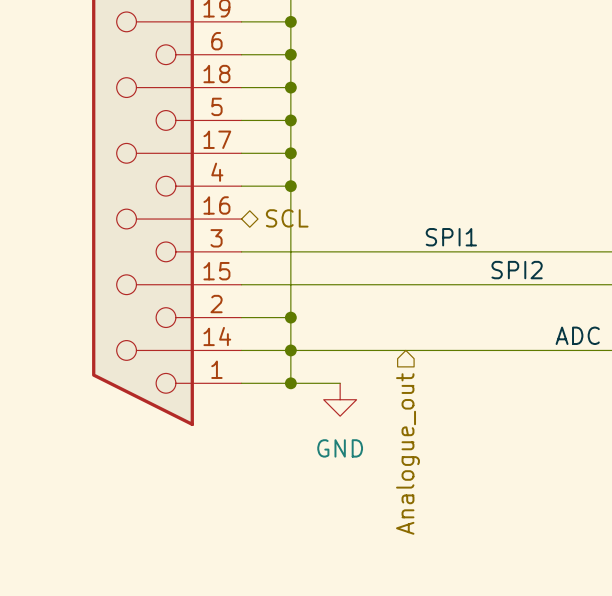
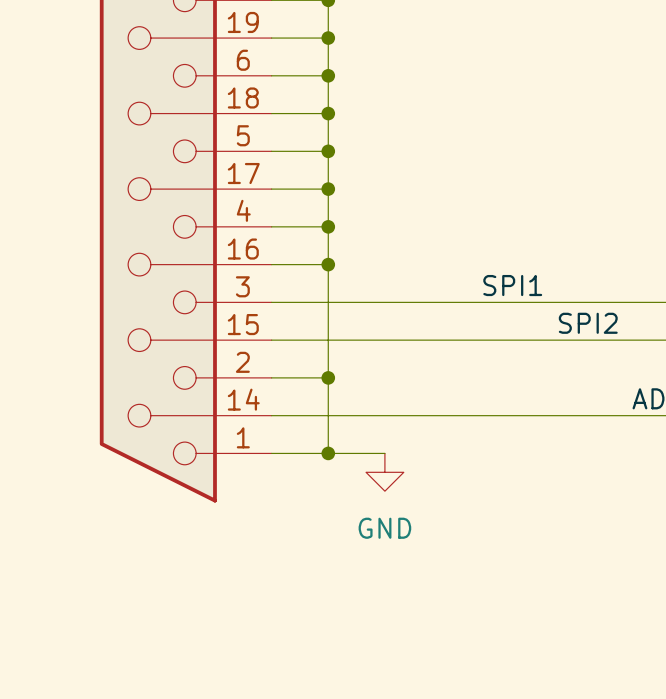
hierarchical label: SCL (287, 218) -> none
wire: none -> (271, 264) (328, 264)
junction: none -> (328, 264)
junction: (290, 350) -> none
hierarchical label: Analogue_out (407, 453) -> none

